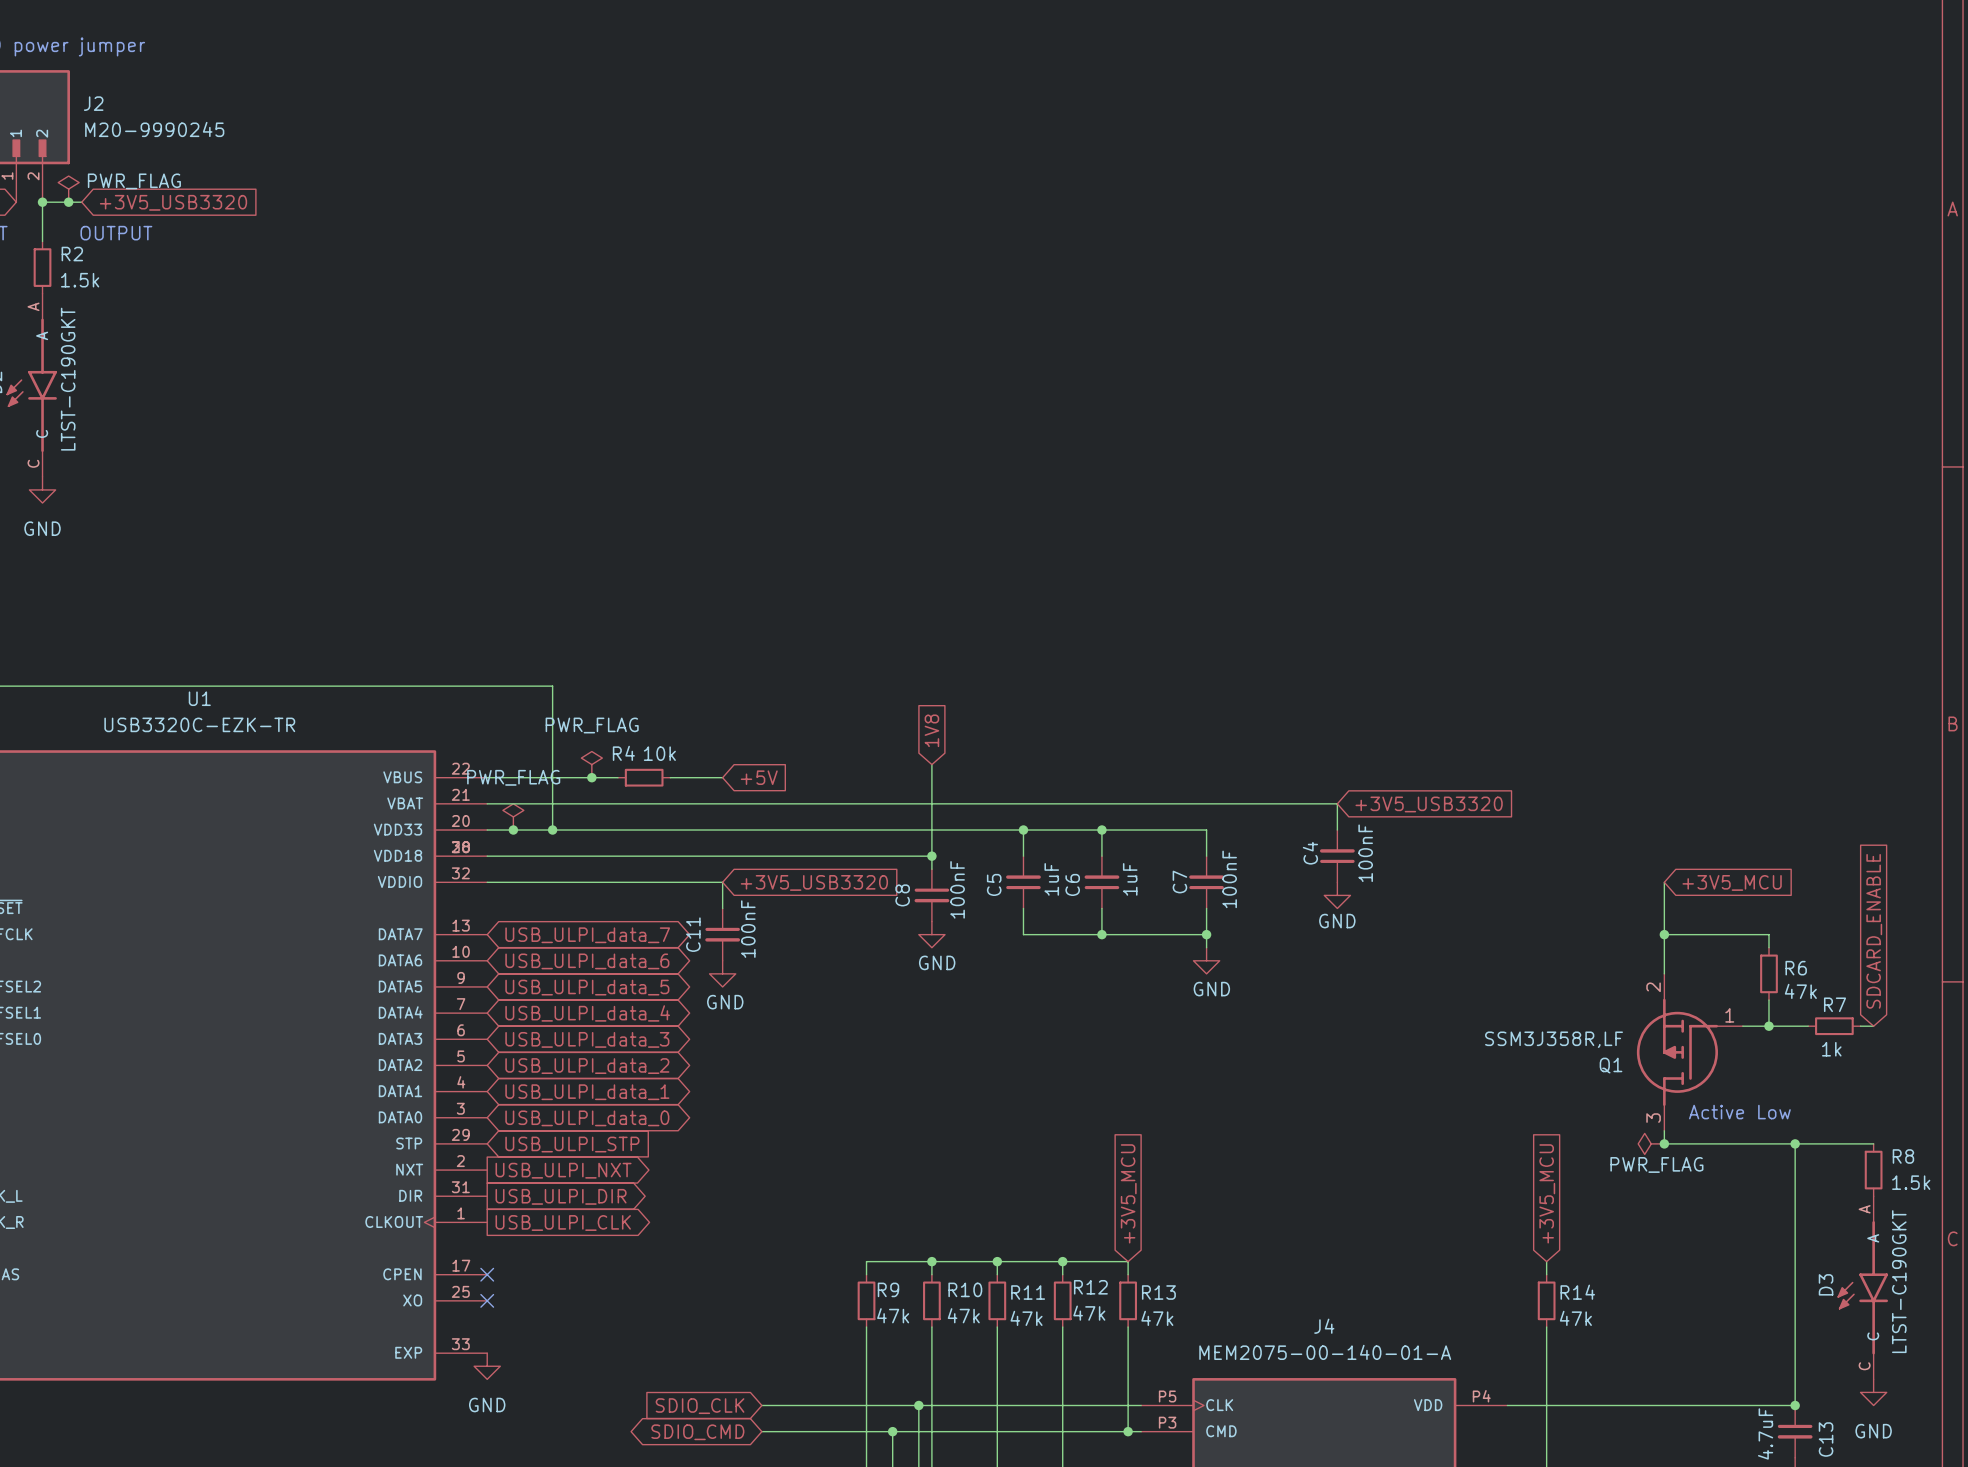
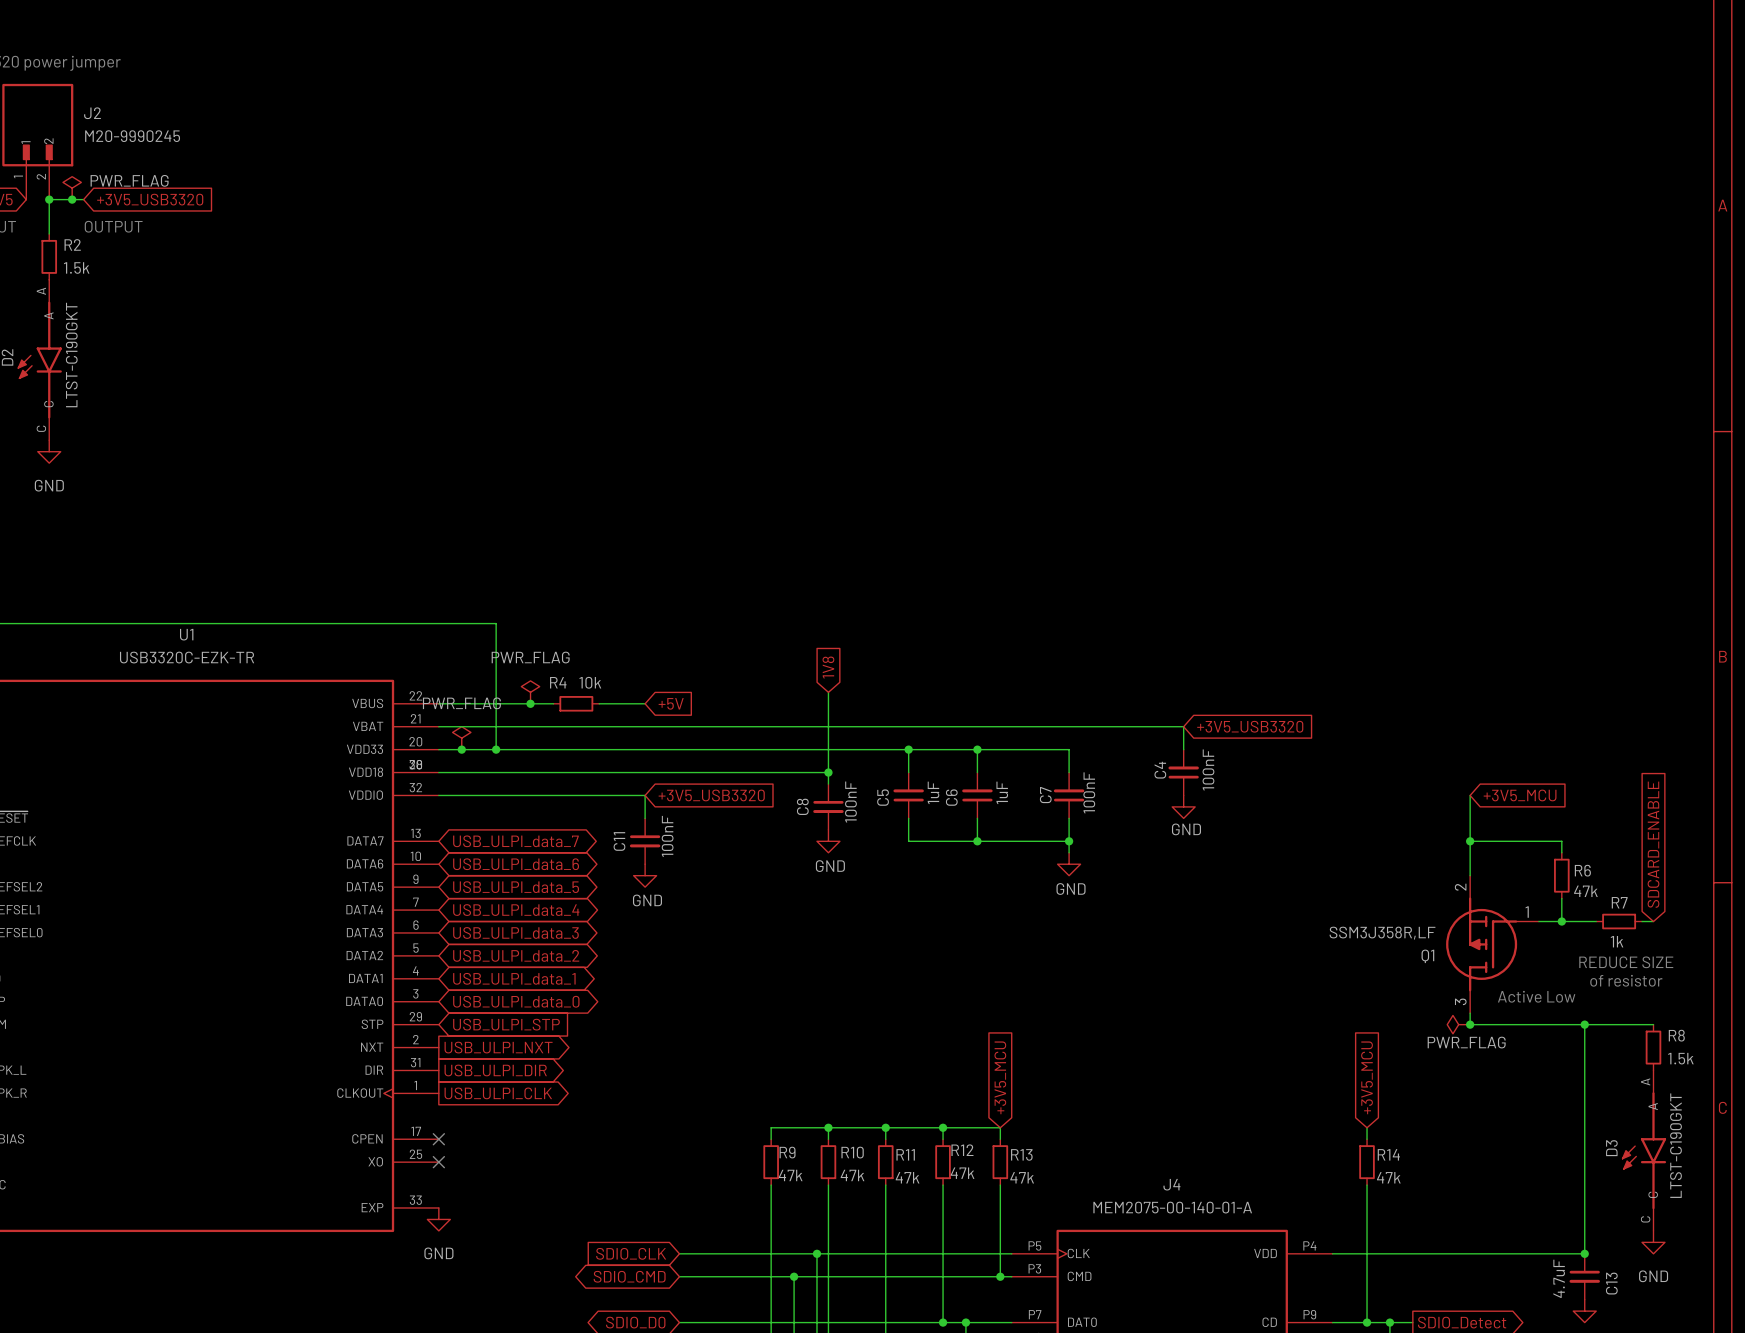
text: none -> REDUCE SIZE (1626, 962)
text: none -> of resistor (1626, 980)

